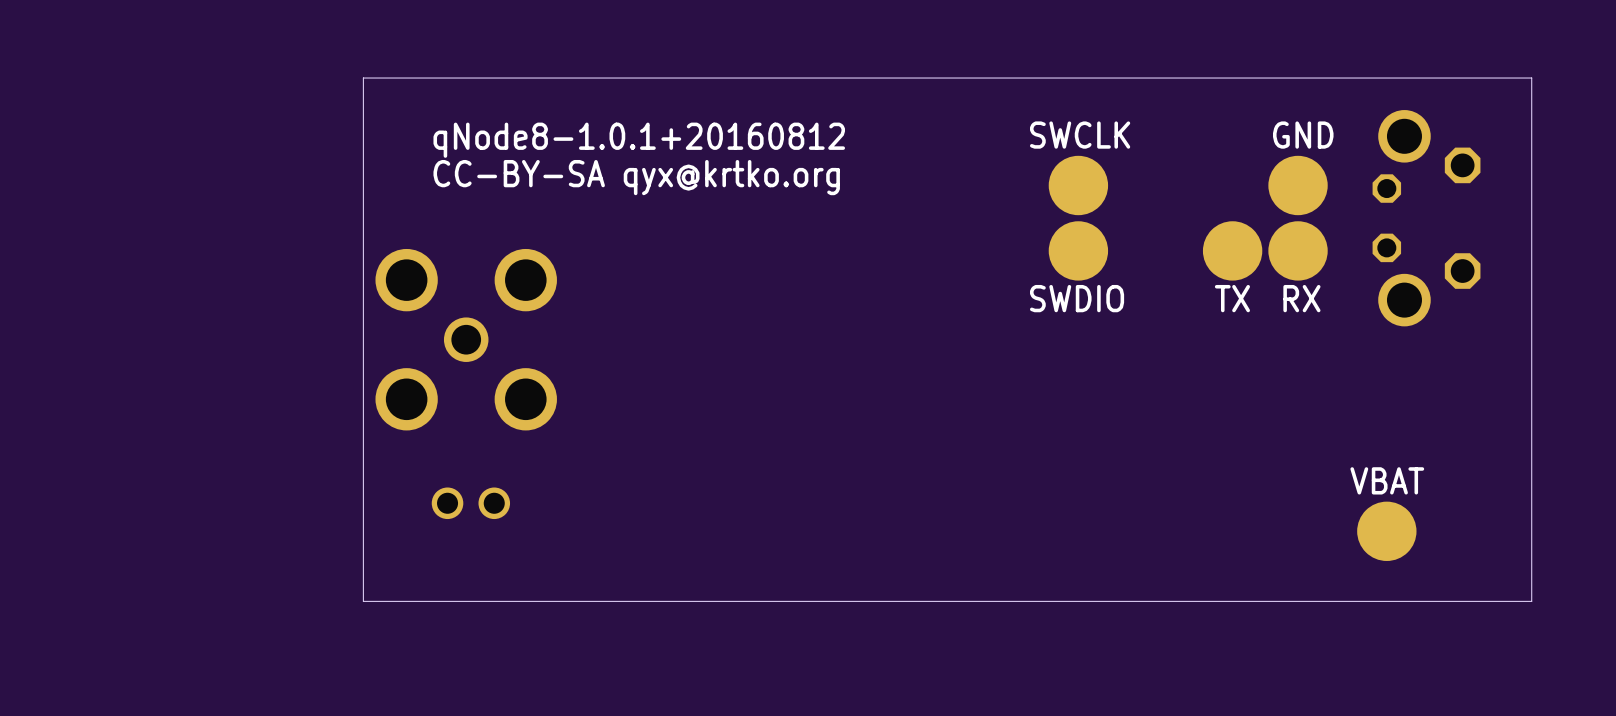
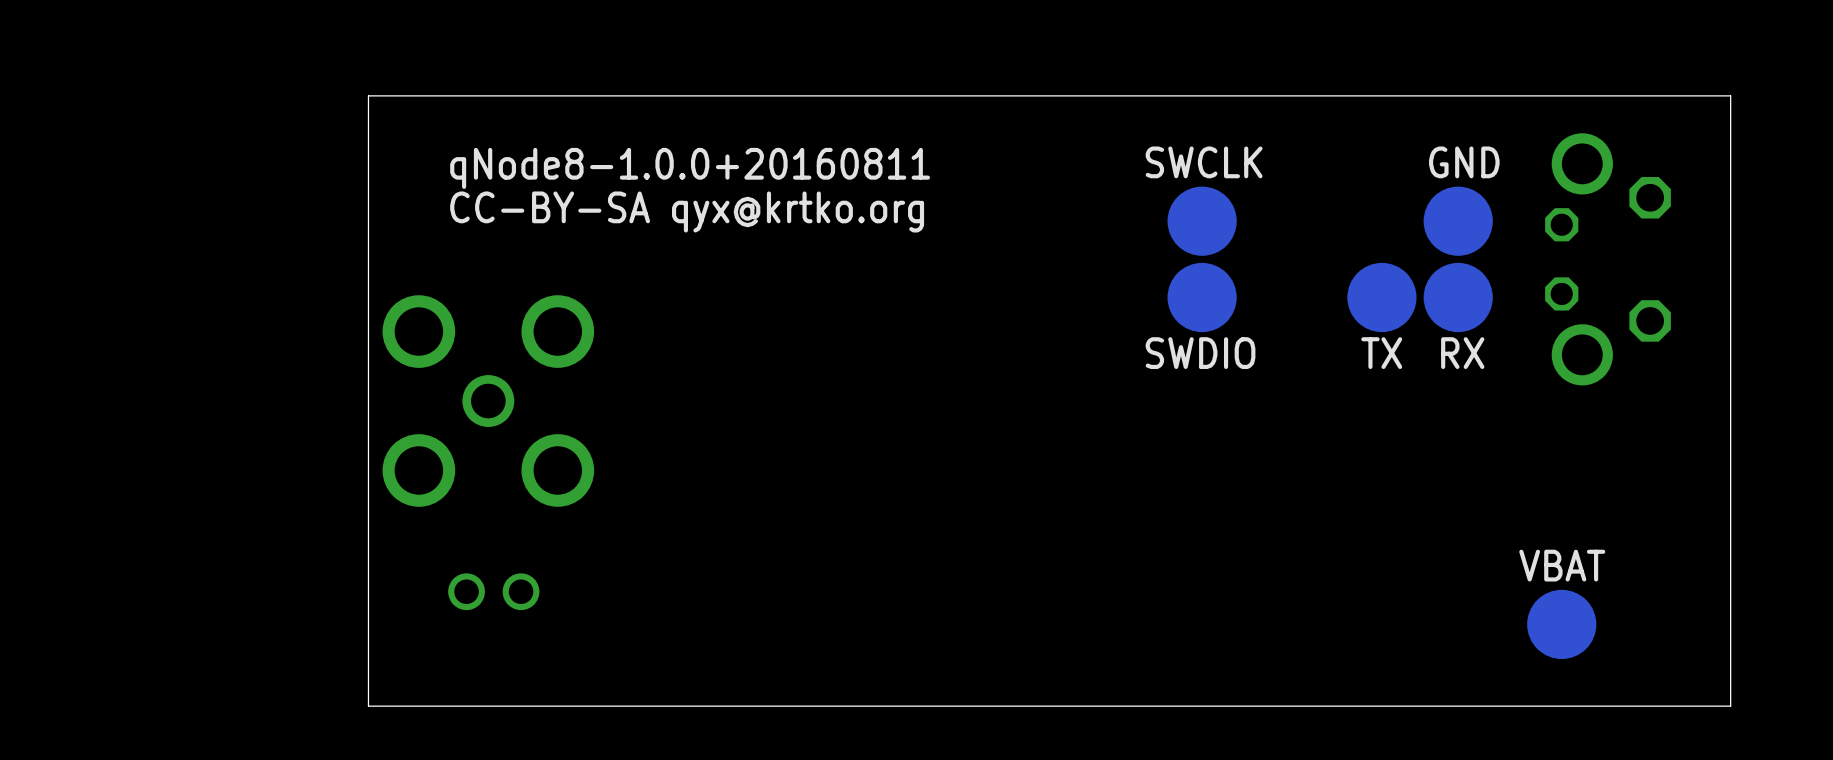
text: qNode8-1.0.1+20160812 (639, 140) -> qNode8-1.0.0+20160811 (690, 168)

